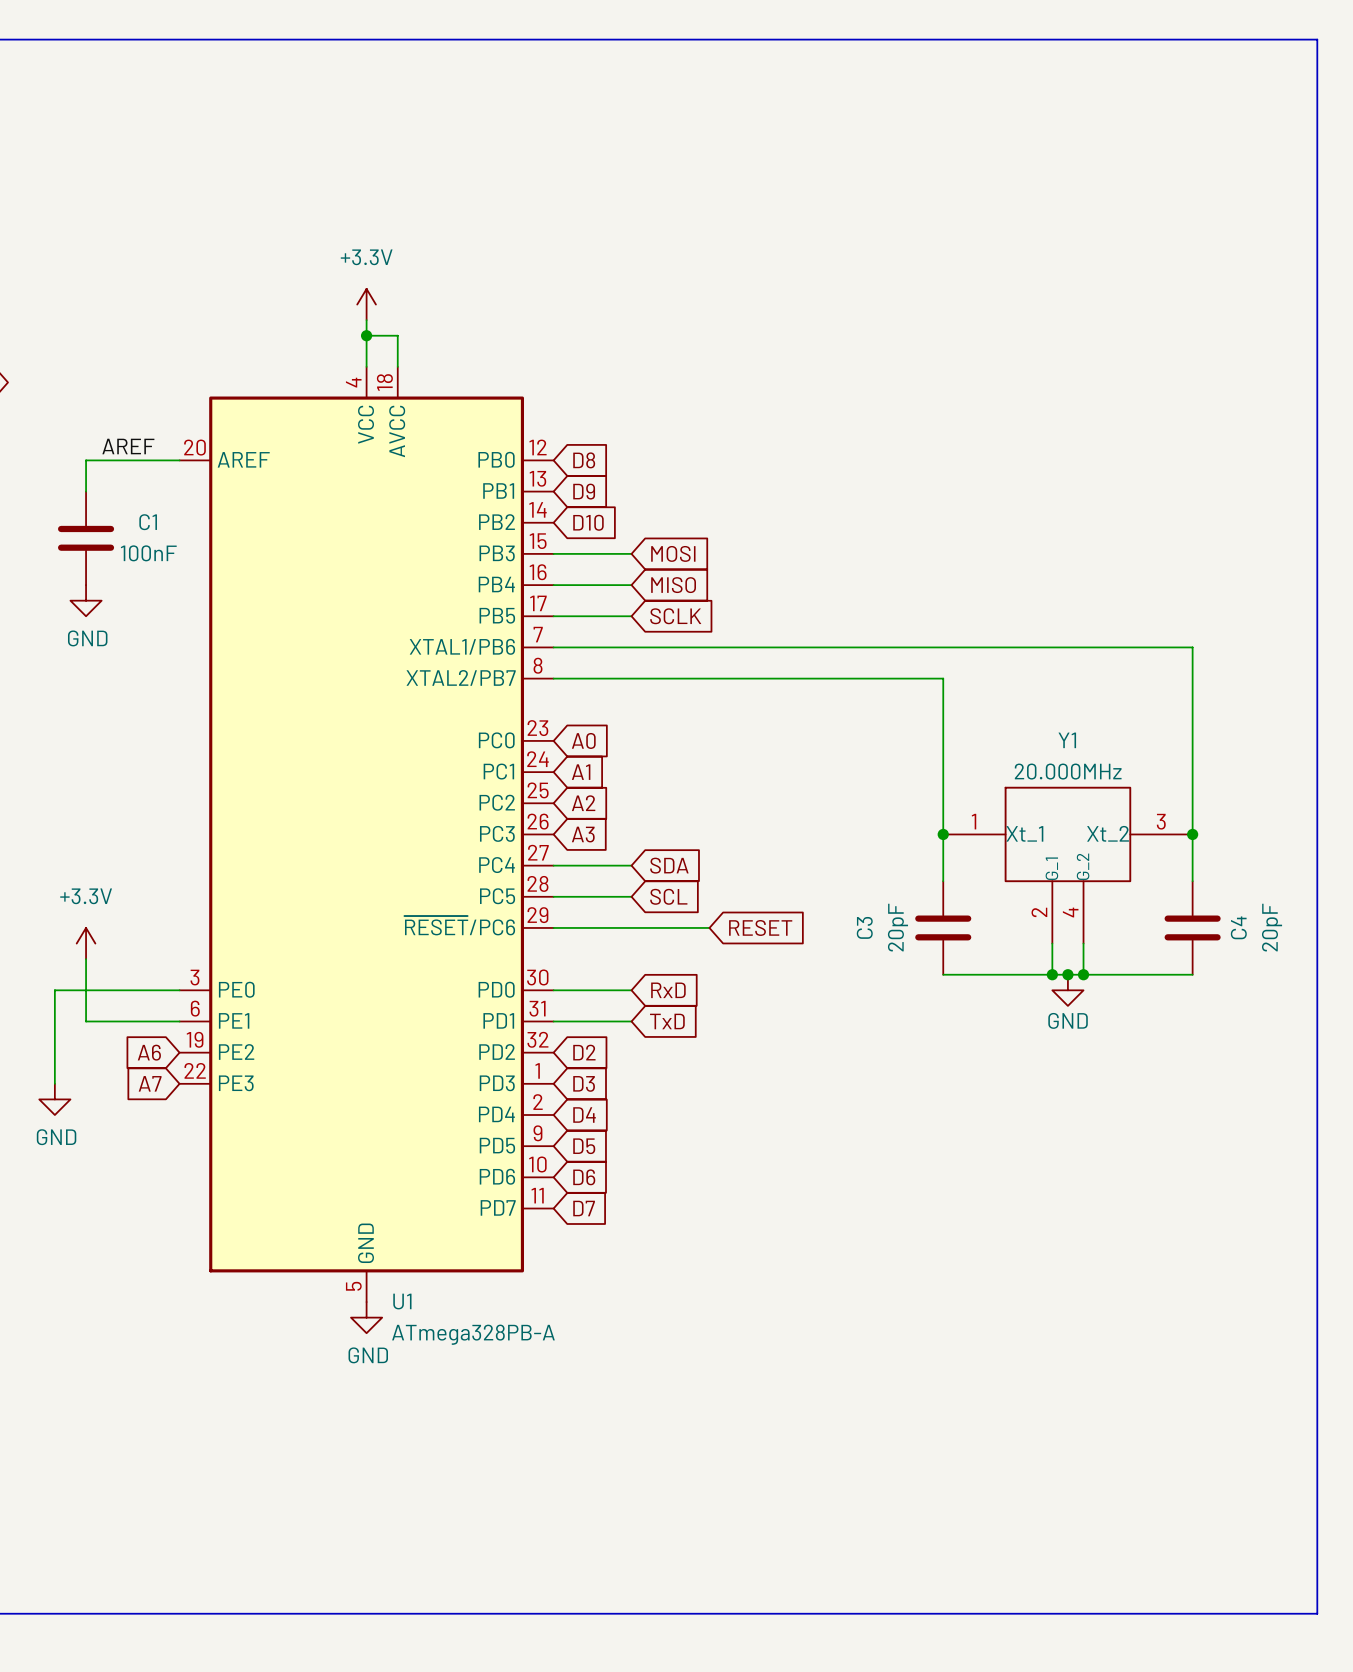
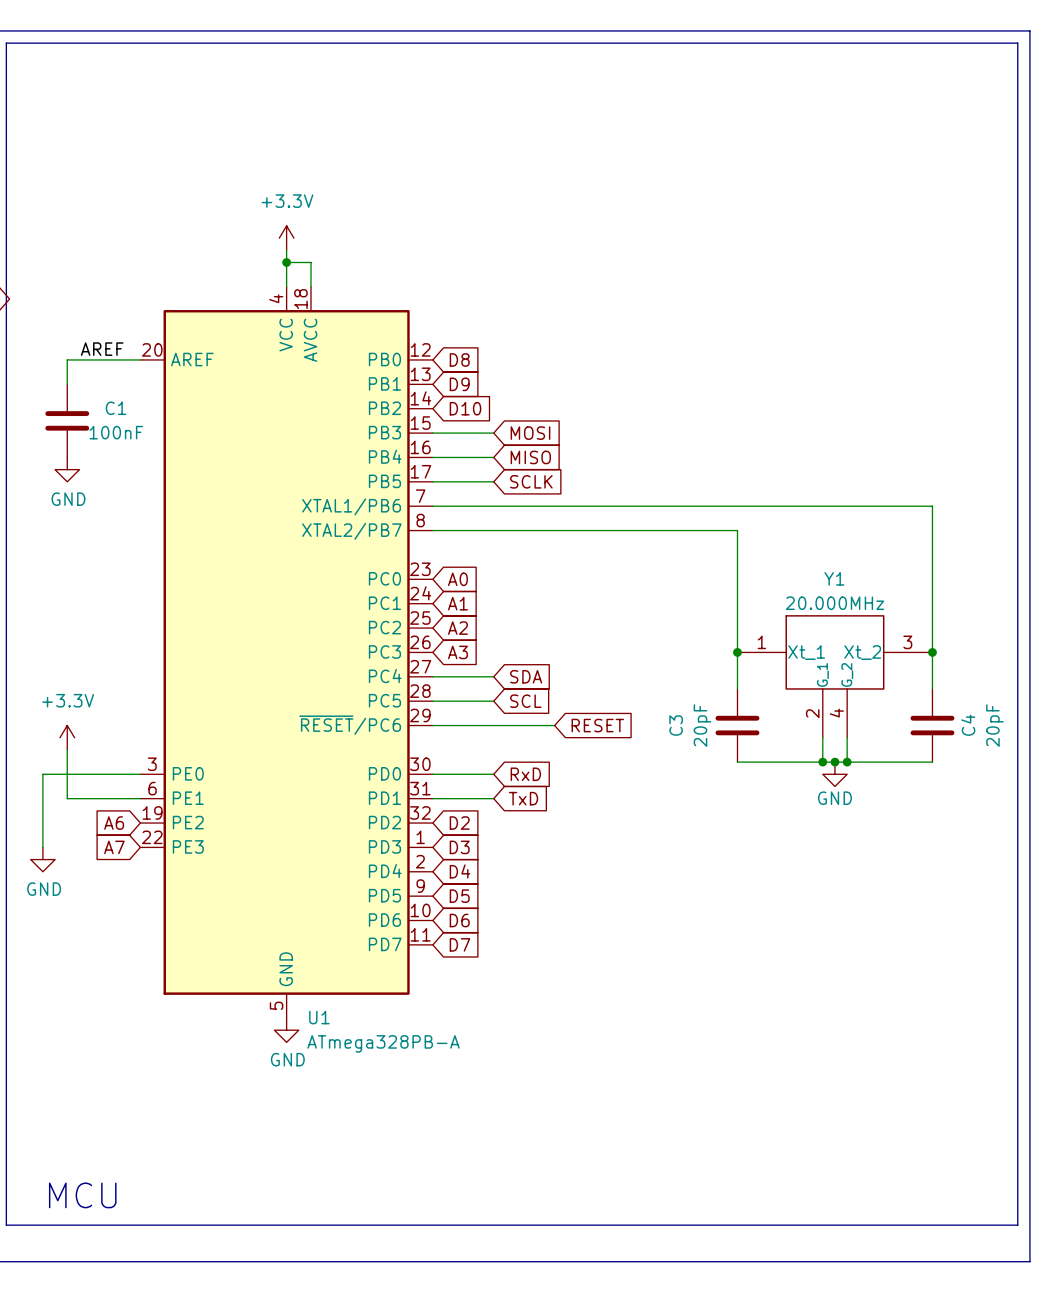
line: none -> (6, 43) (6, 1225) (1017, 1225) (1017, 43) (6, 43)
text: none -> MCU (82, 1195)

